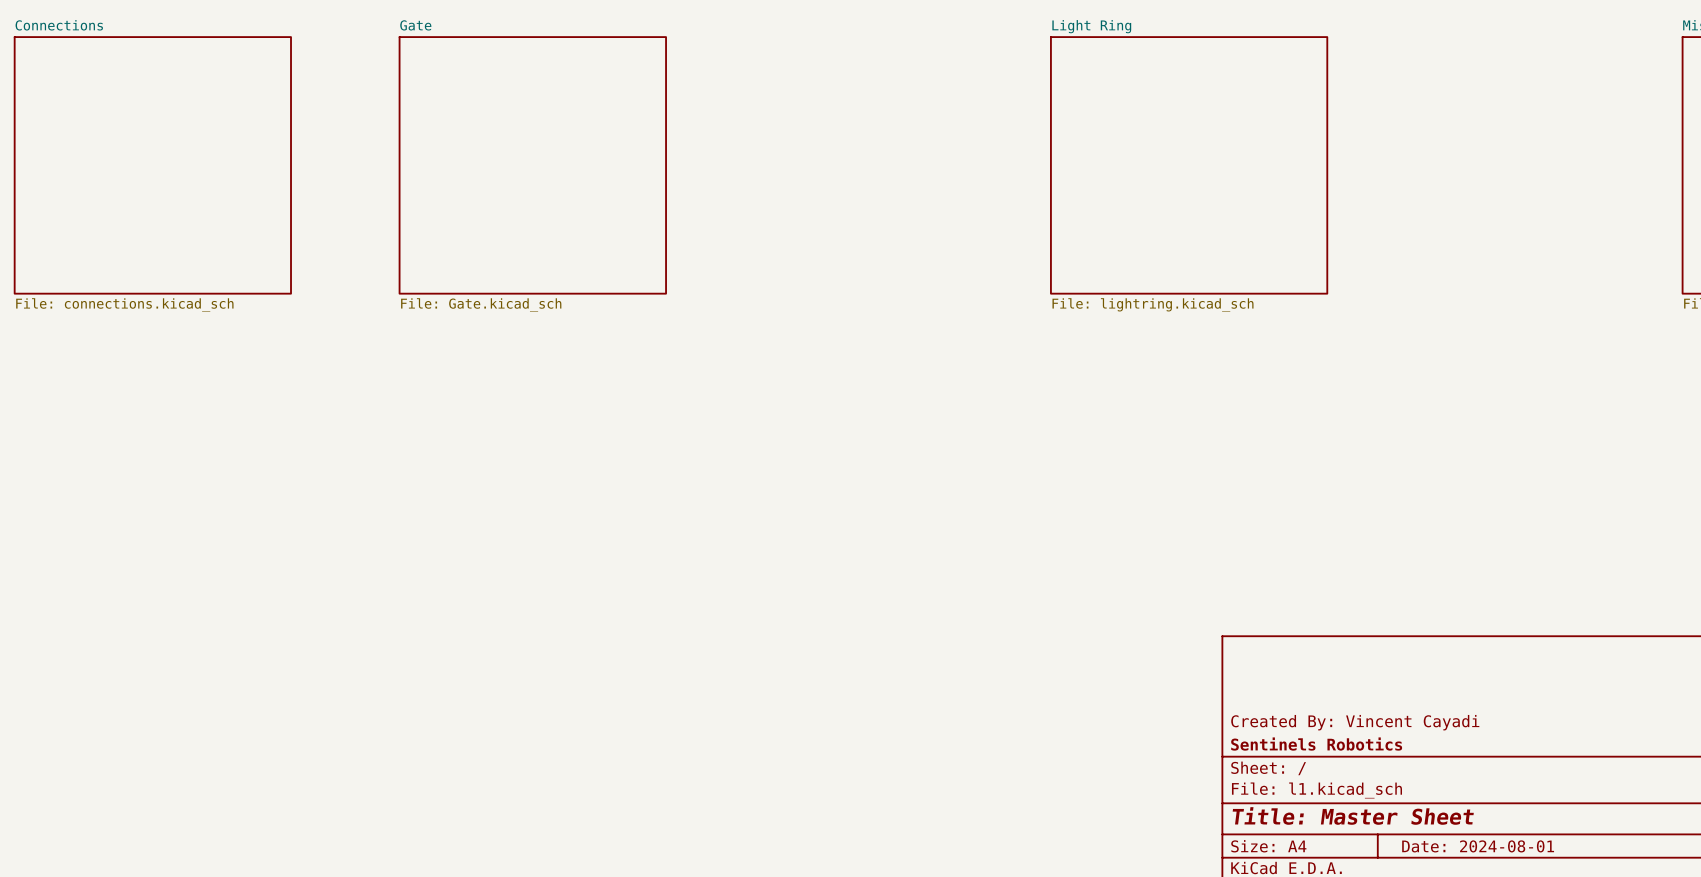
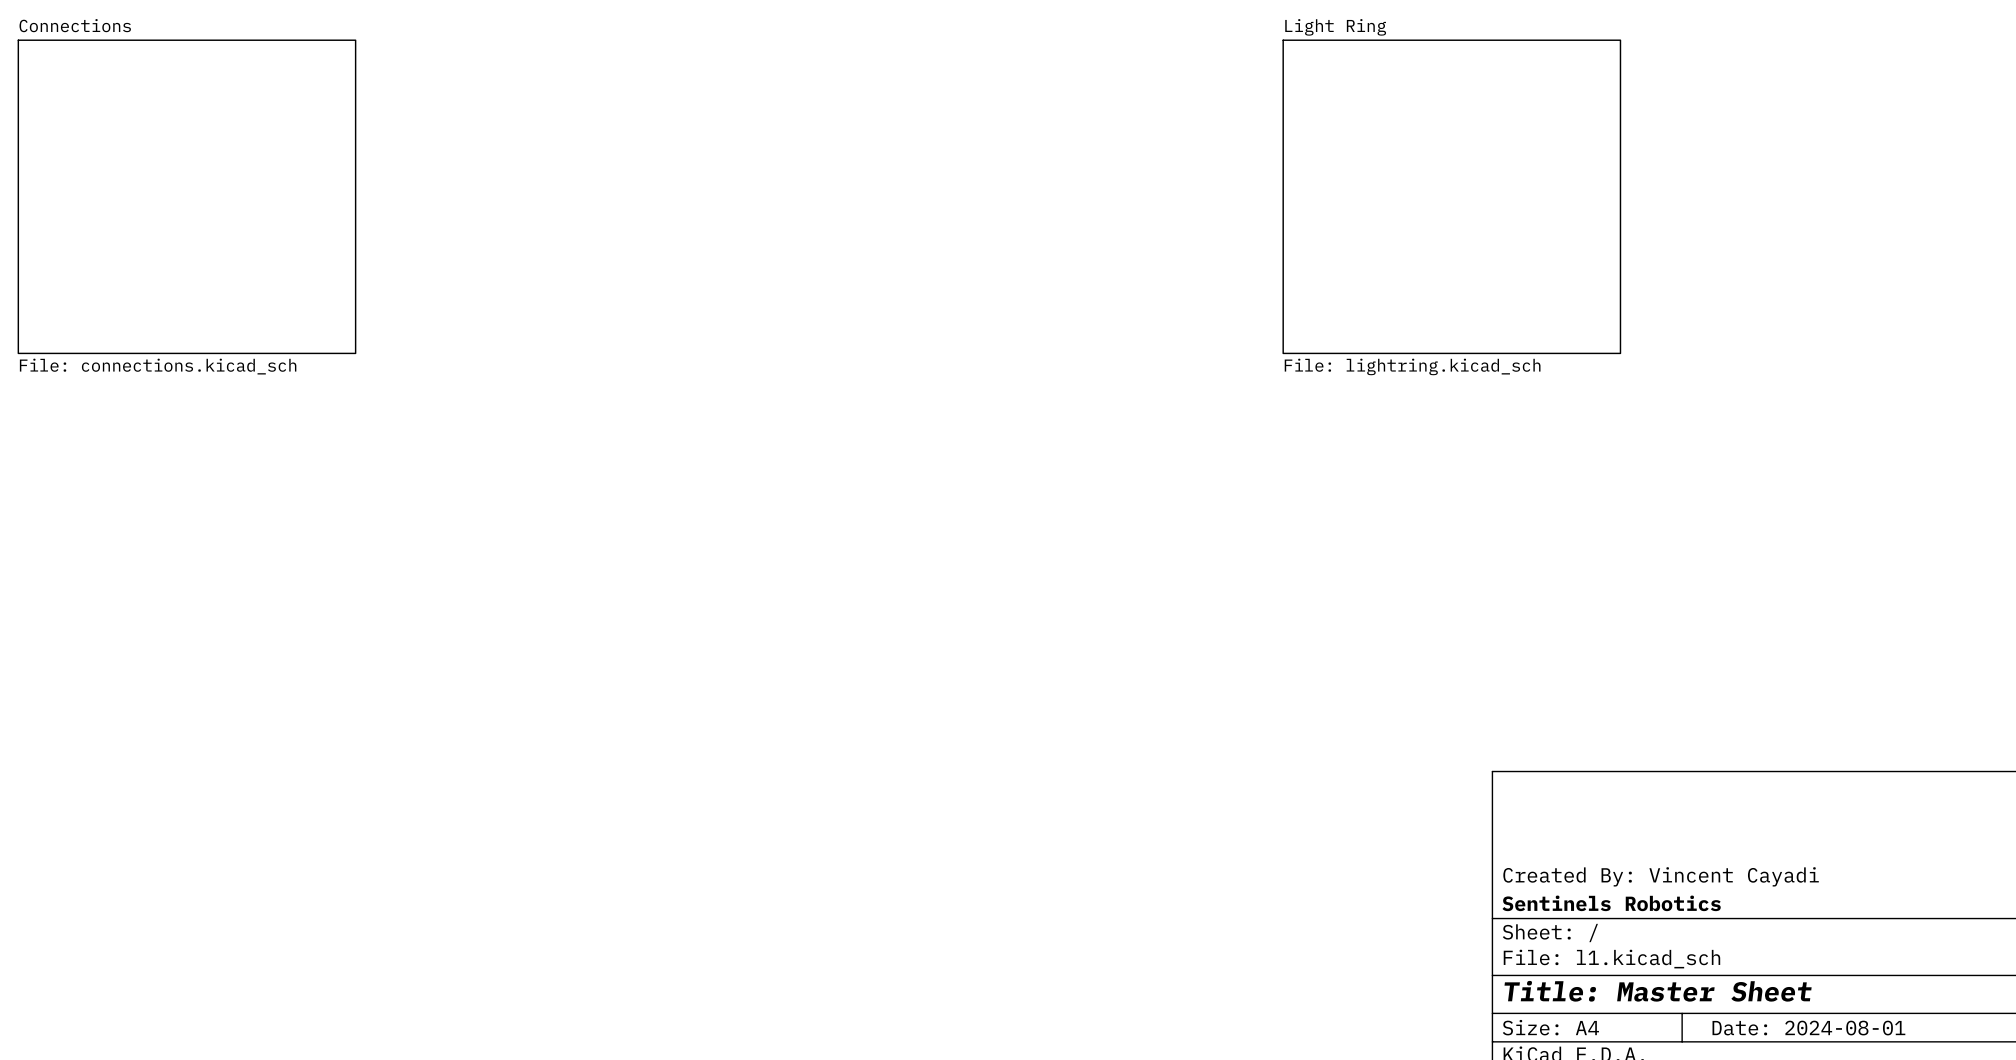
sheet Gate: File: Gate.kicad_sch (532, 165) -> none

